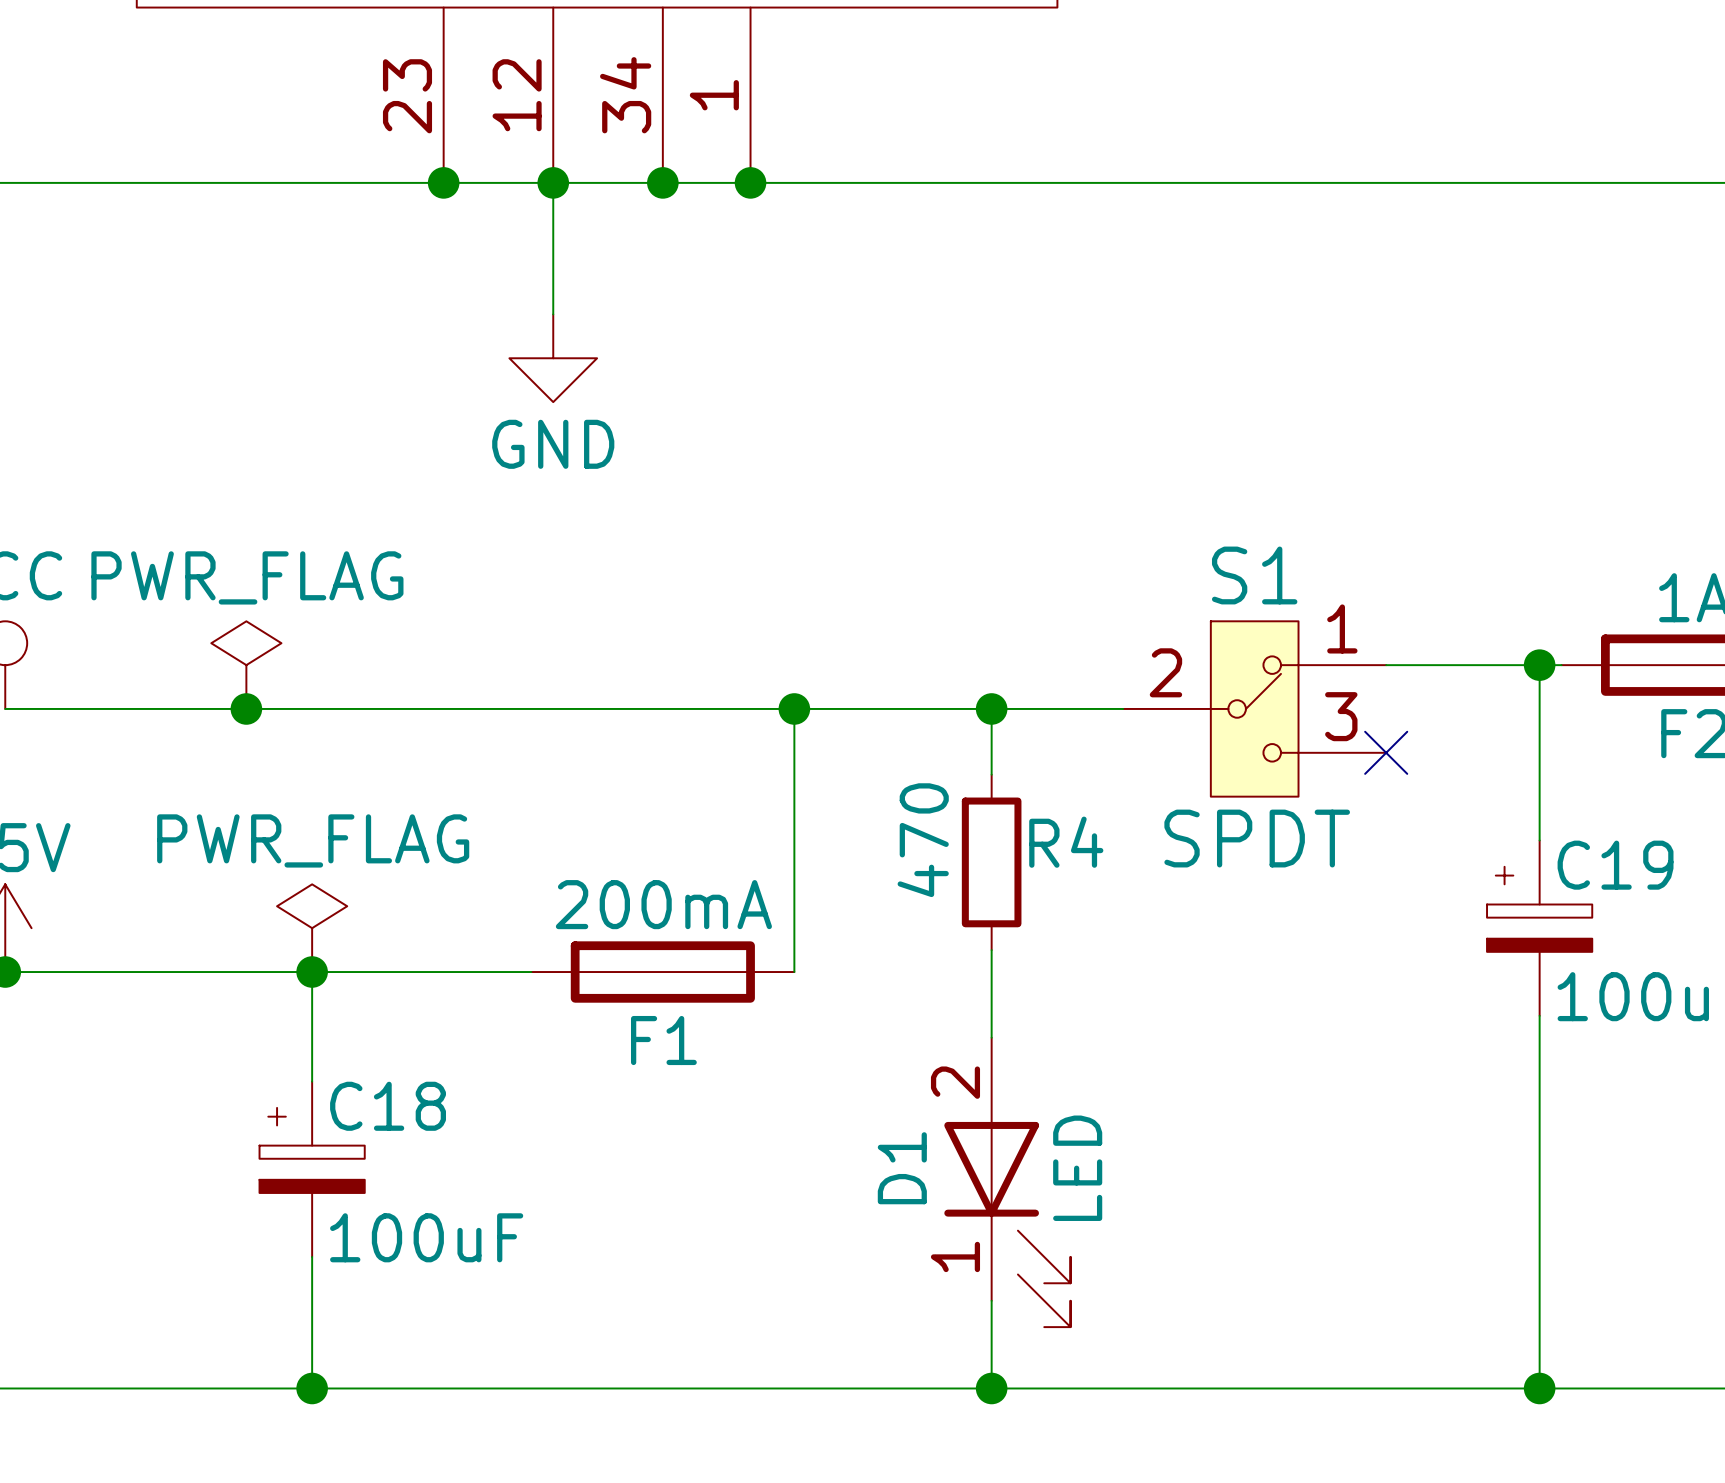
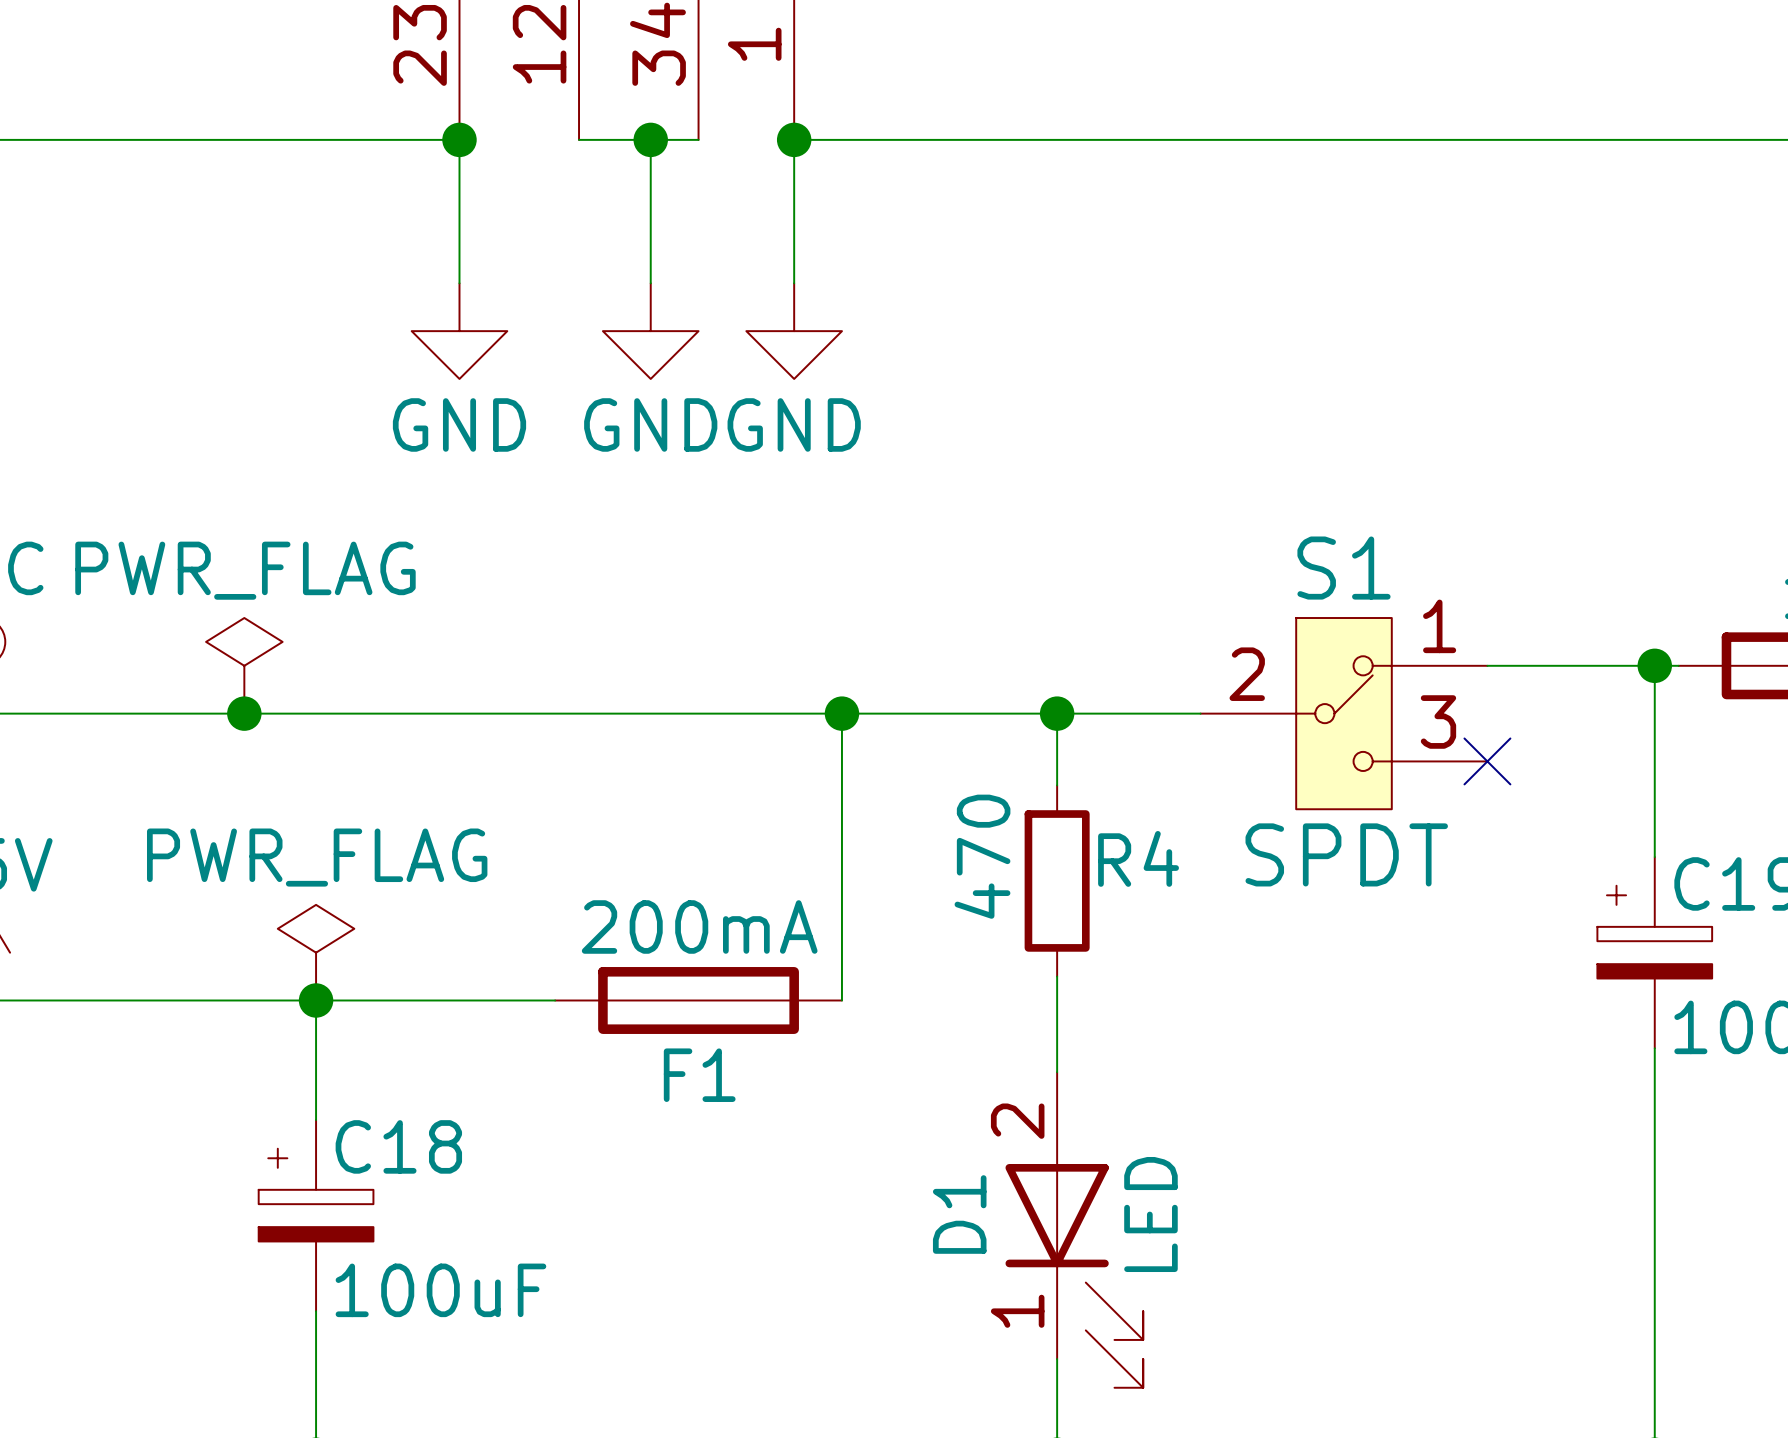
wire: (443, 182) (553, 182) (553, 314) -> (459, 139) (459, 283)
junction: (553, 182) -> none
wire: none -> (650, 139) (650, 283)
junction: none -> (650, 139)
wire: (662, 182) (750, 182) -> (794, 283) (794, 139)
junction: (662, 182) -> none
power symbol: none -> GND (459, 331)
power symbol: GND (553, 358) -> none
power symbol: none -> GND (650, 331)
power symbol: none -> GND (794, 331)

